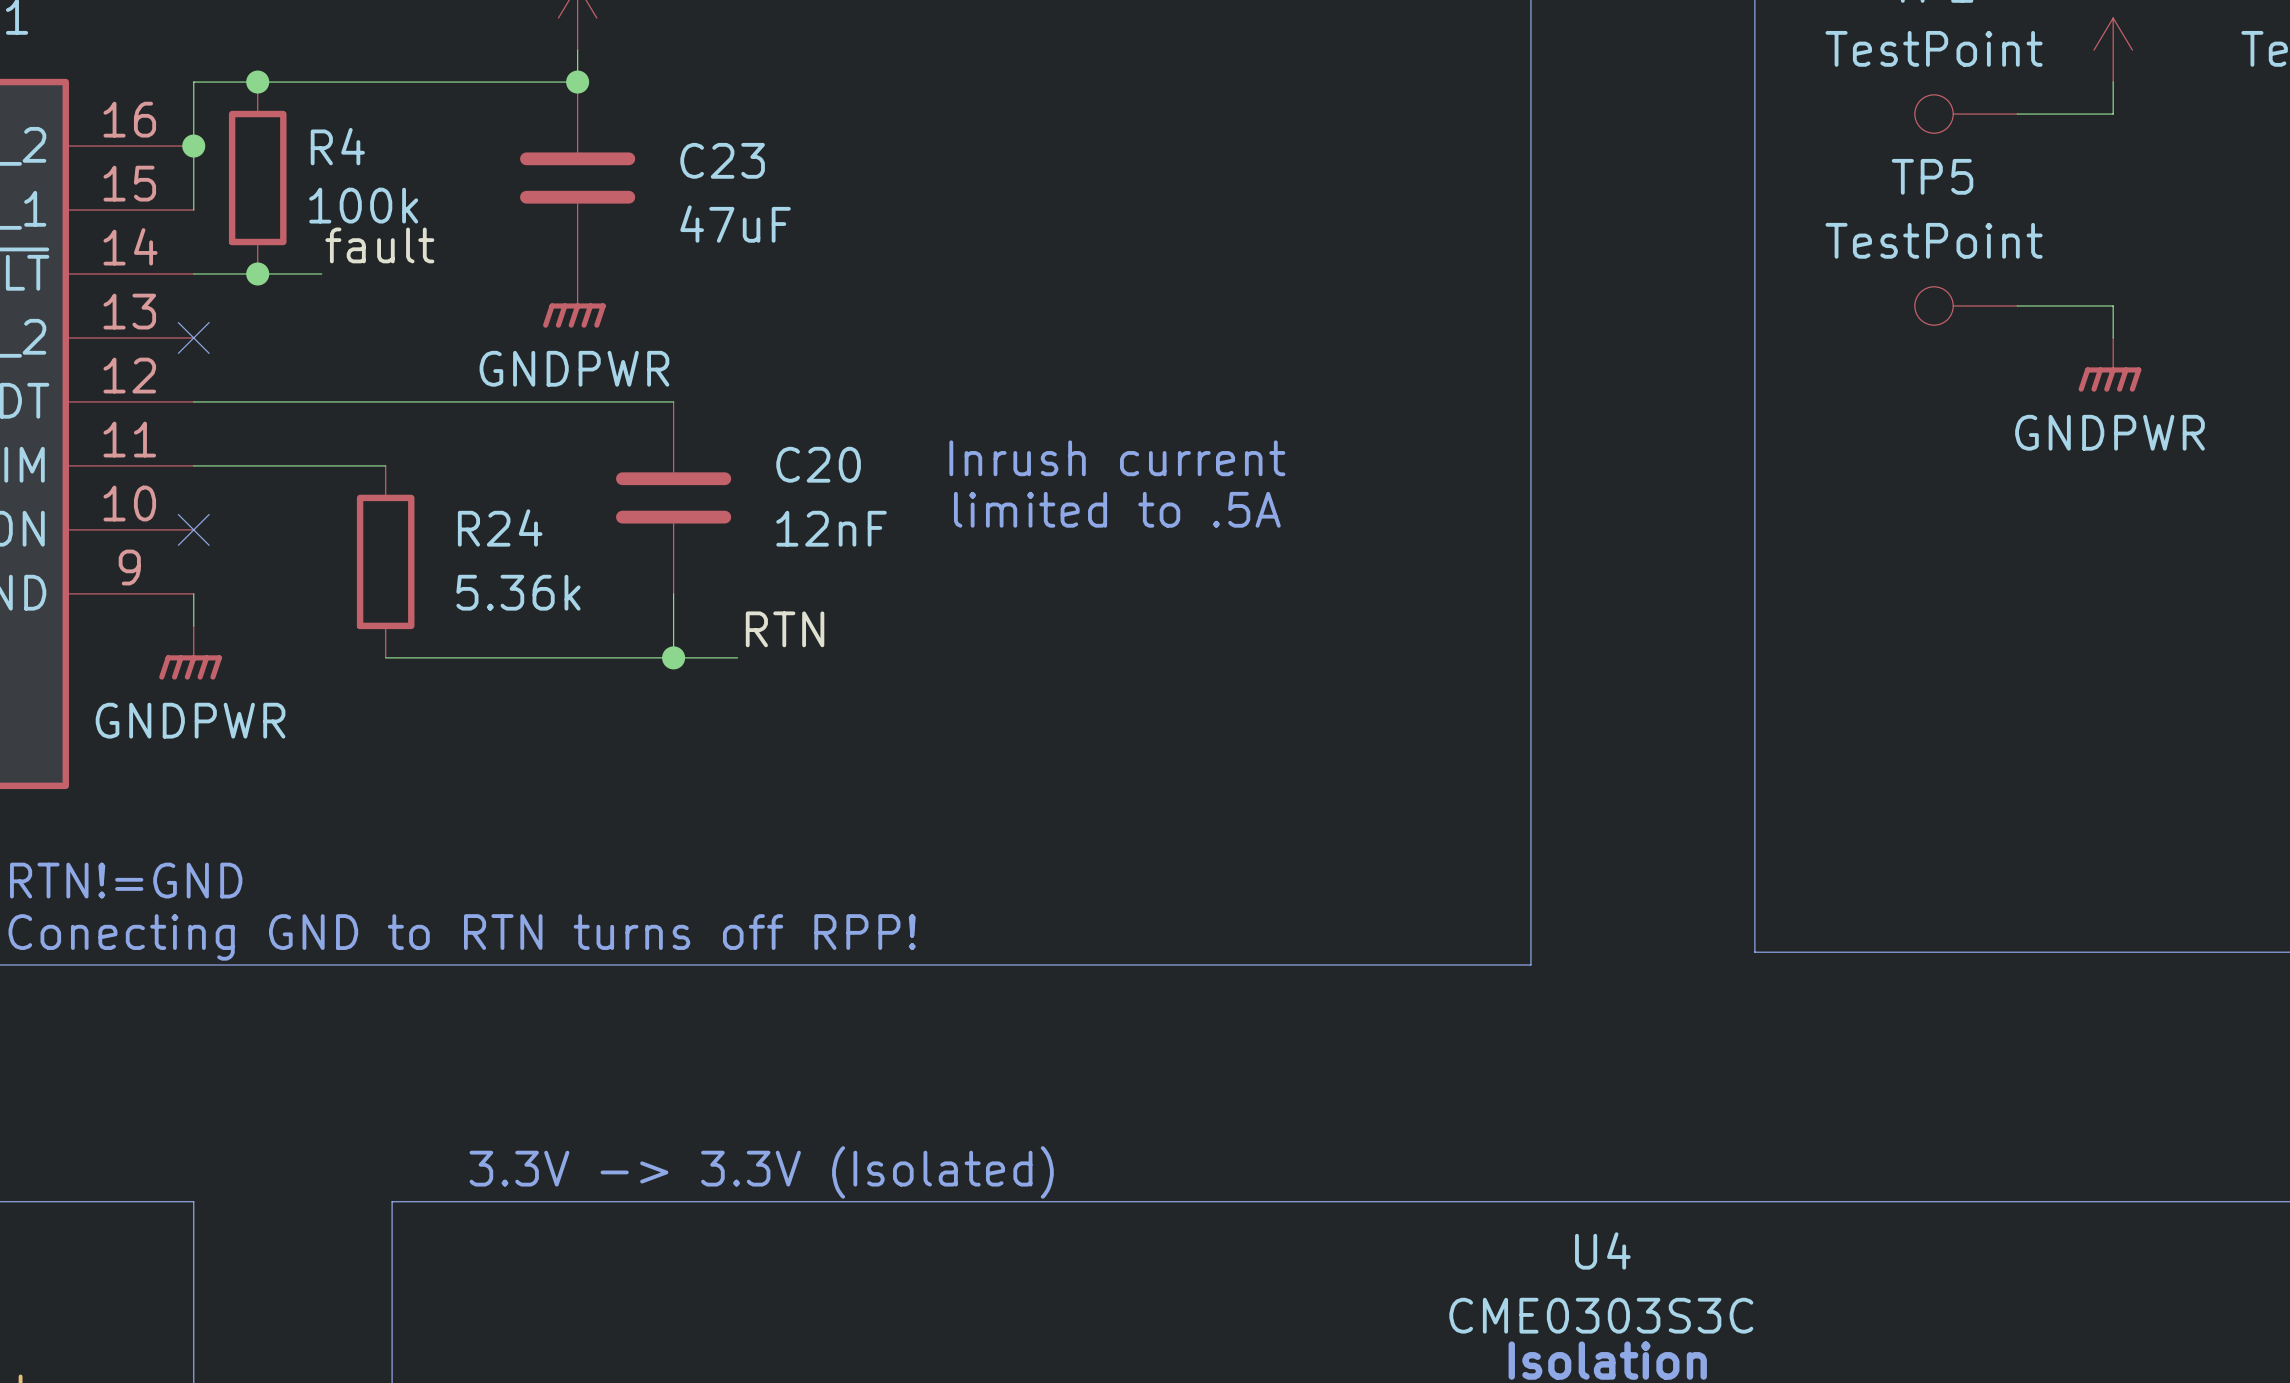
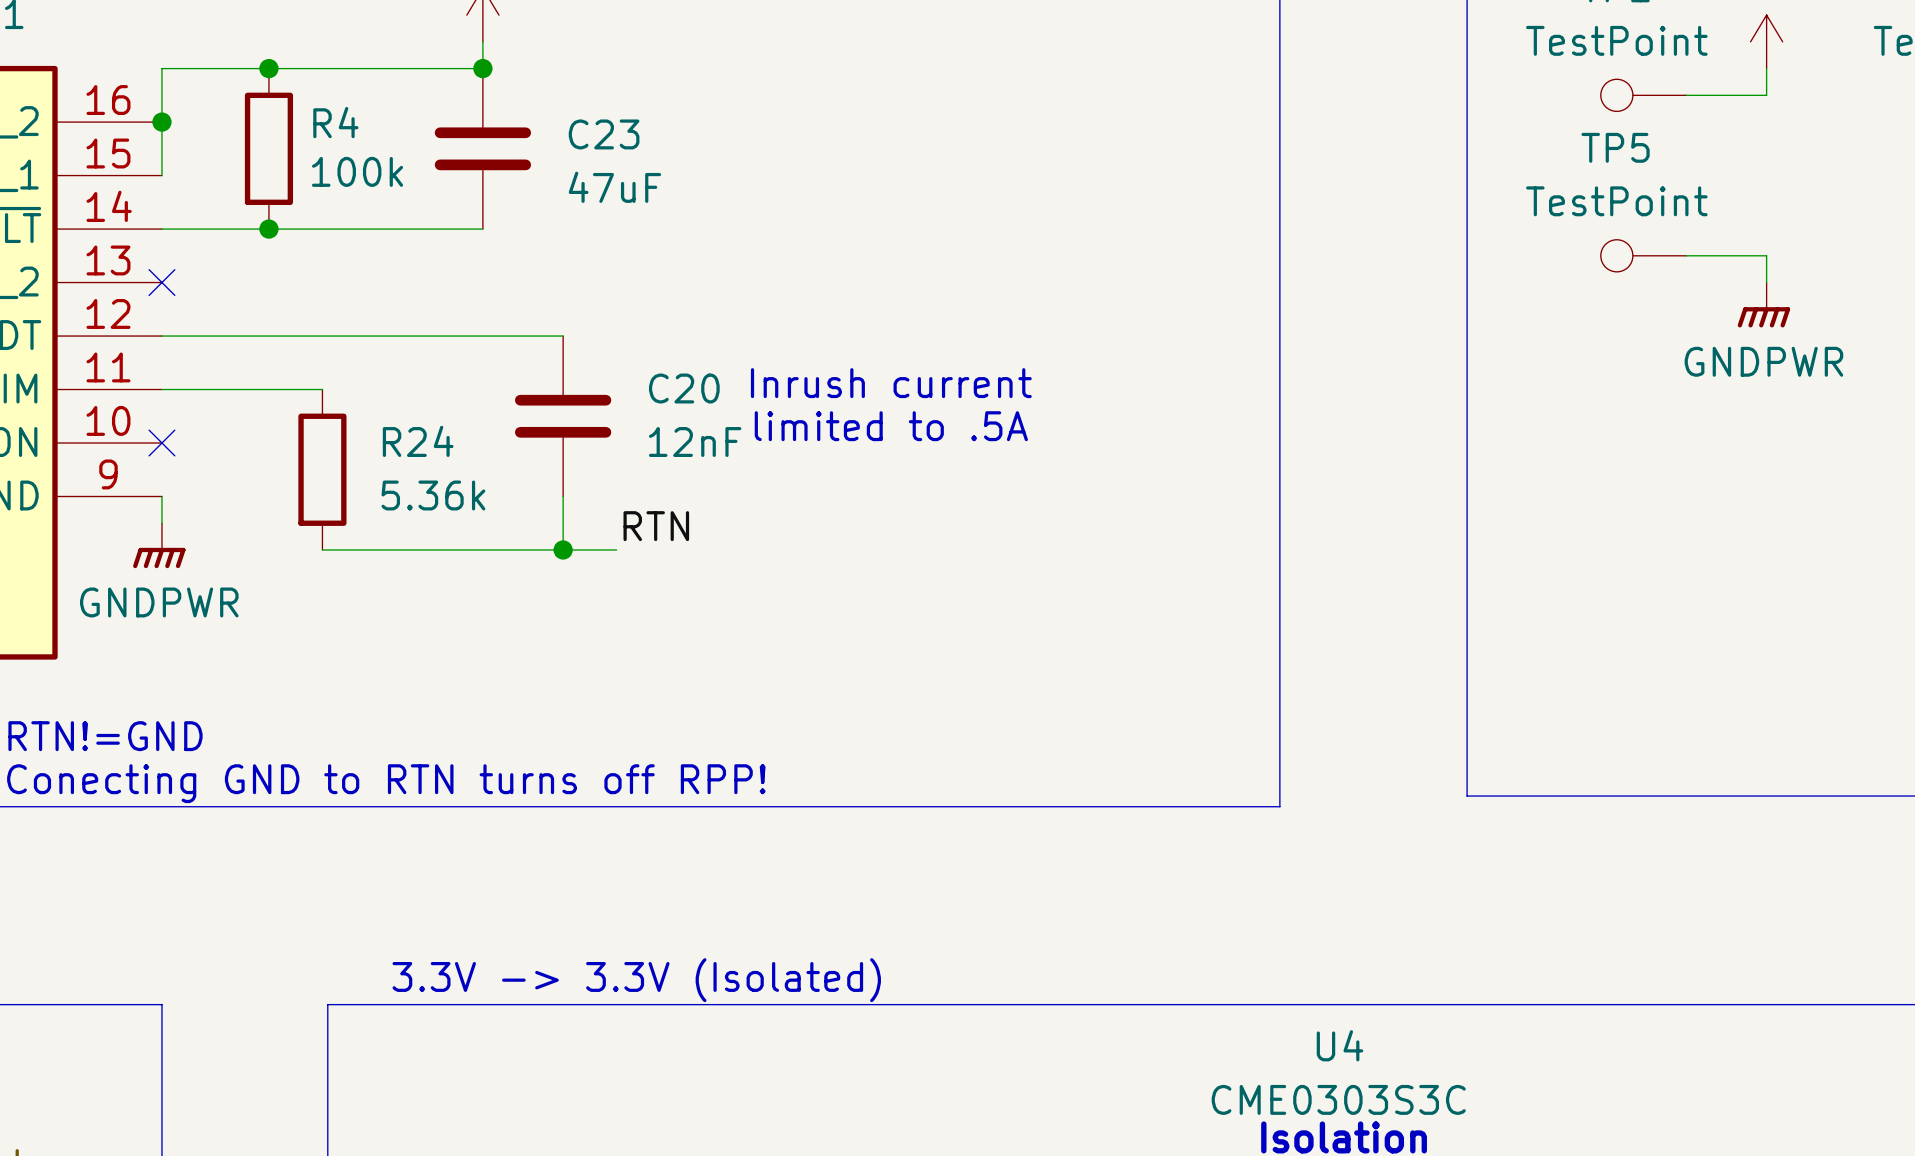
junction position: (257, 82) -> (268, 68)
R4 position: (257, 178) -> (268, 148)
label: fault (379, 245) -> none
junction position: (257, 273) -> (268, 229)
wire: none -> (268, 229) (482, 229)
power symbol: GNDPWR (574, 300) -> none
text position: Inrush current (1117, 458) -> Inrush current (891, 383)
text position: limited to .5A (1117, 509) -> limited to .5A (891, 426)

